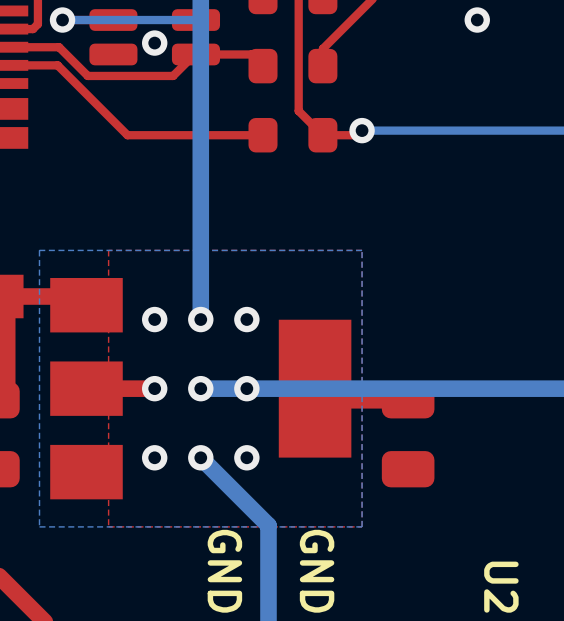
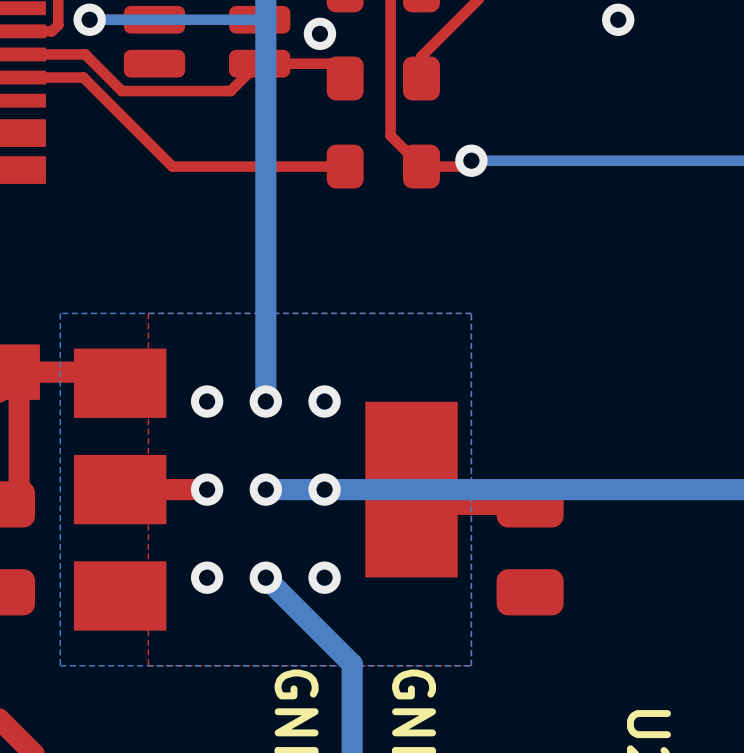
via position: (154, 43) -> (319, 33)

